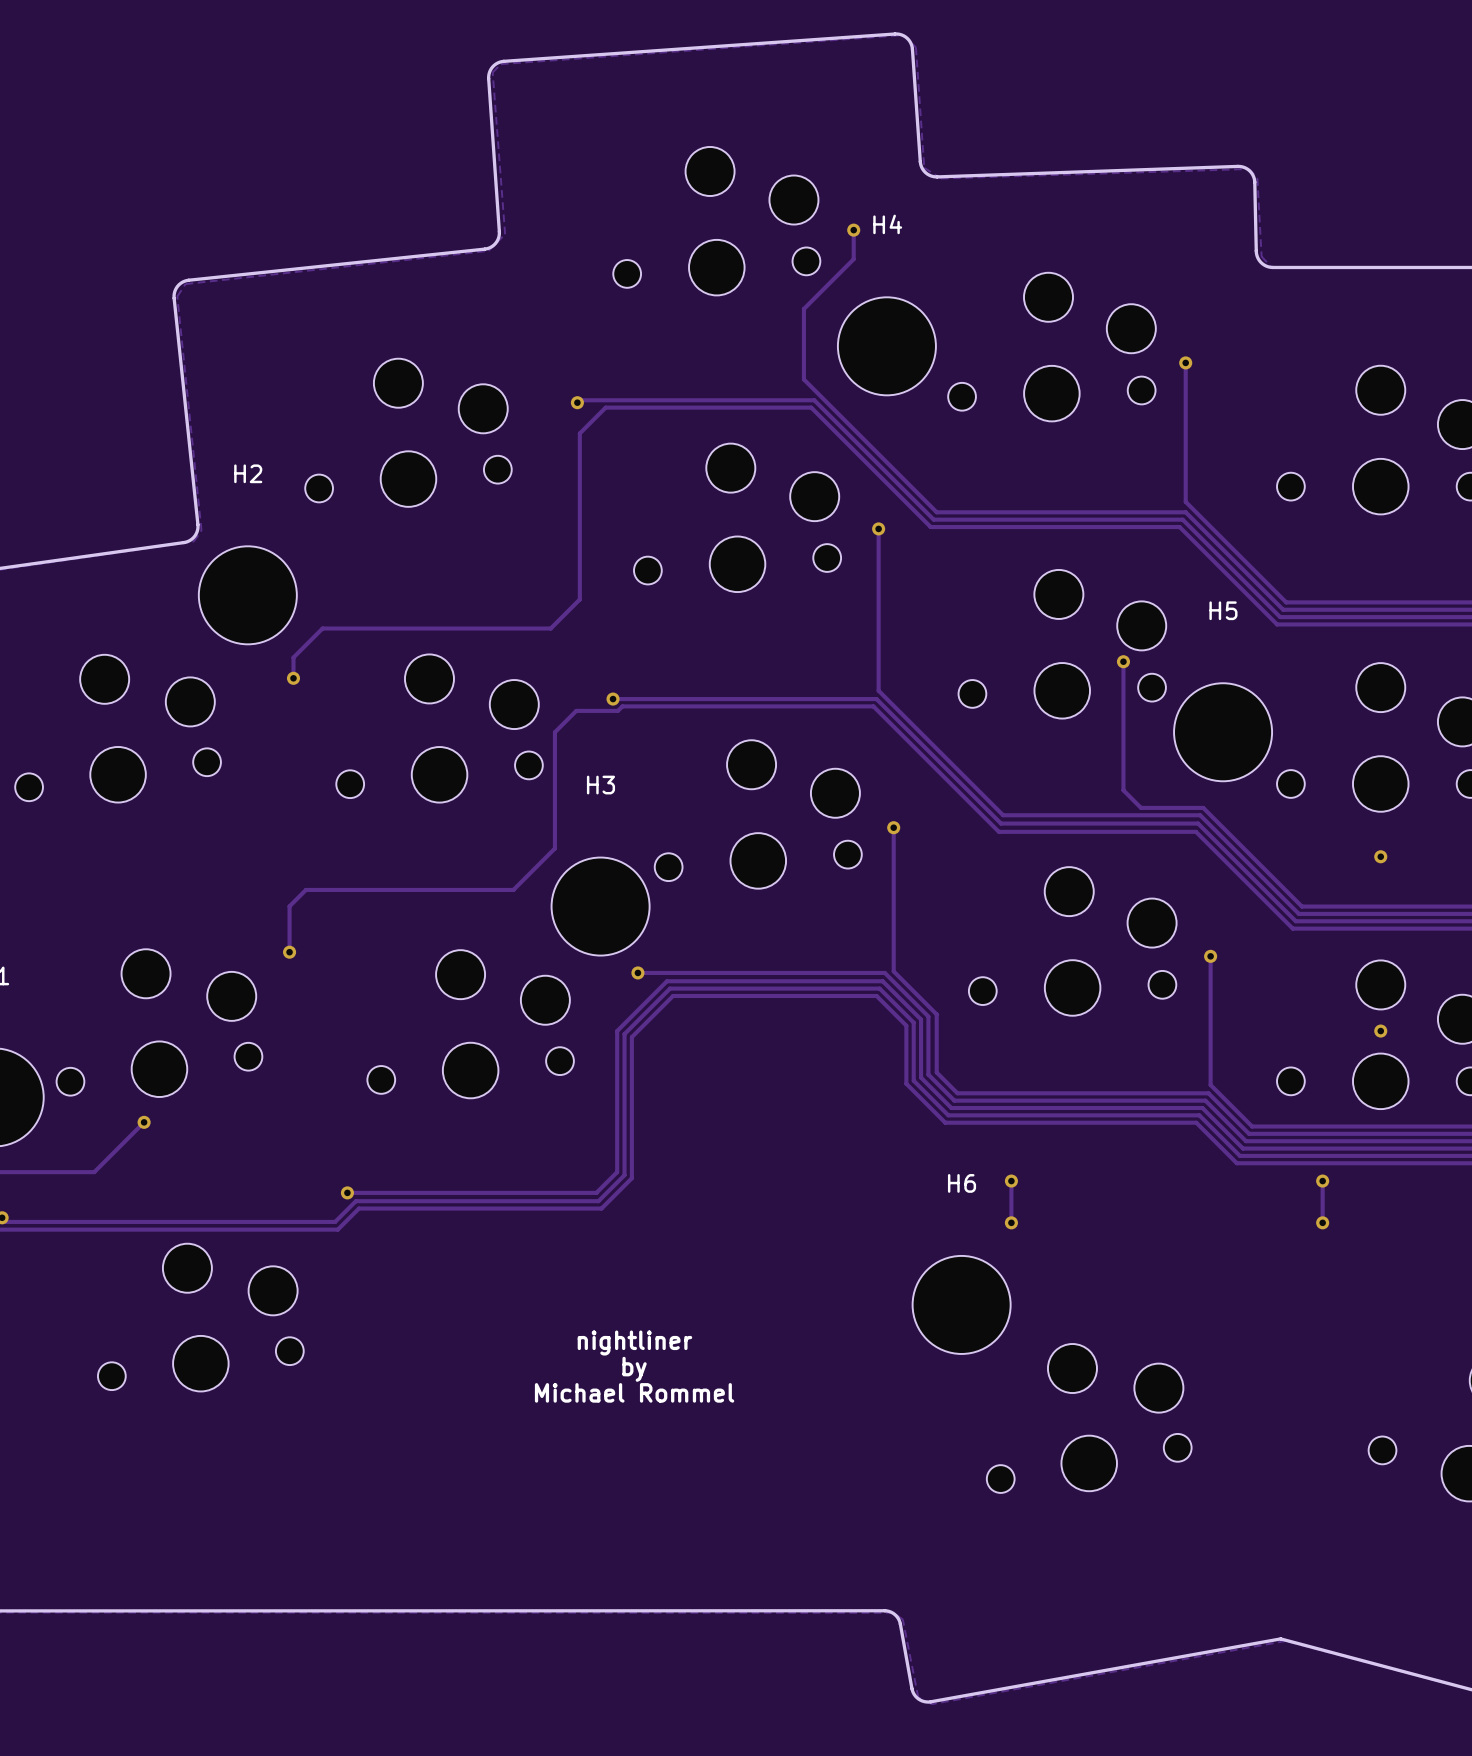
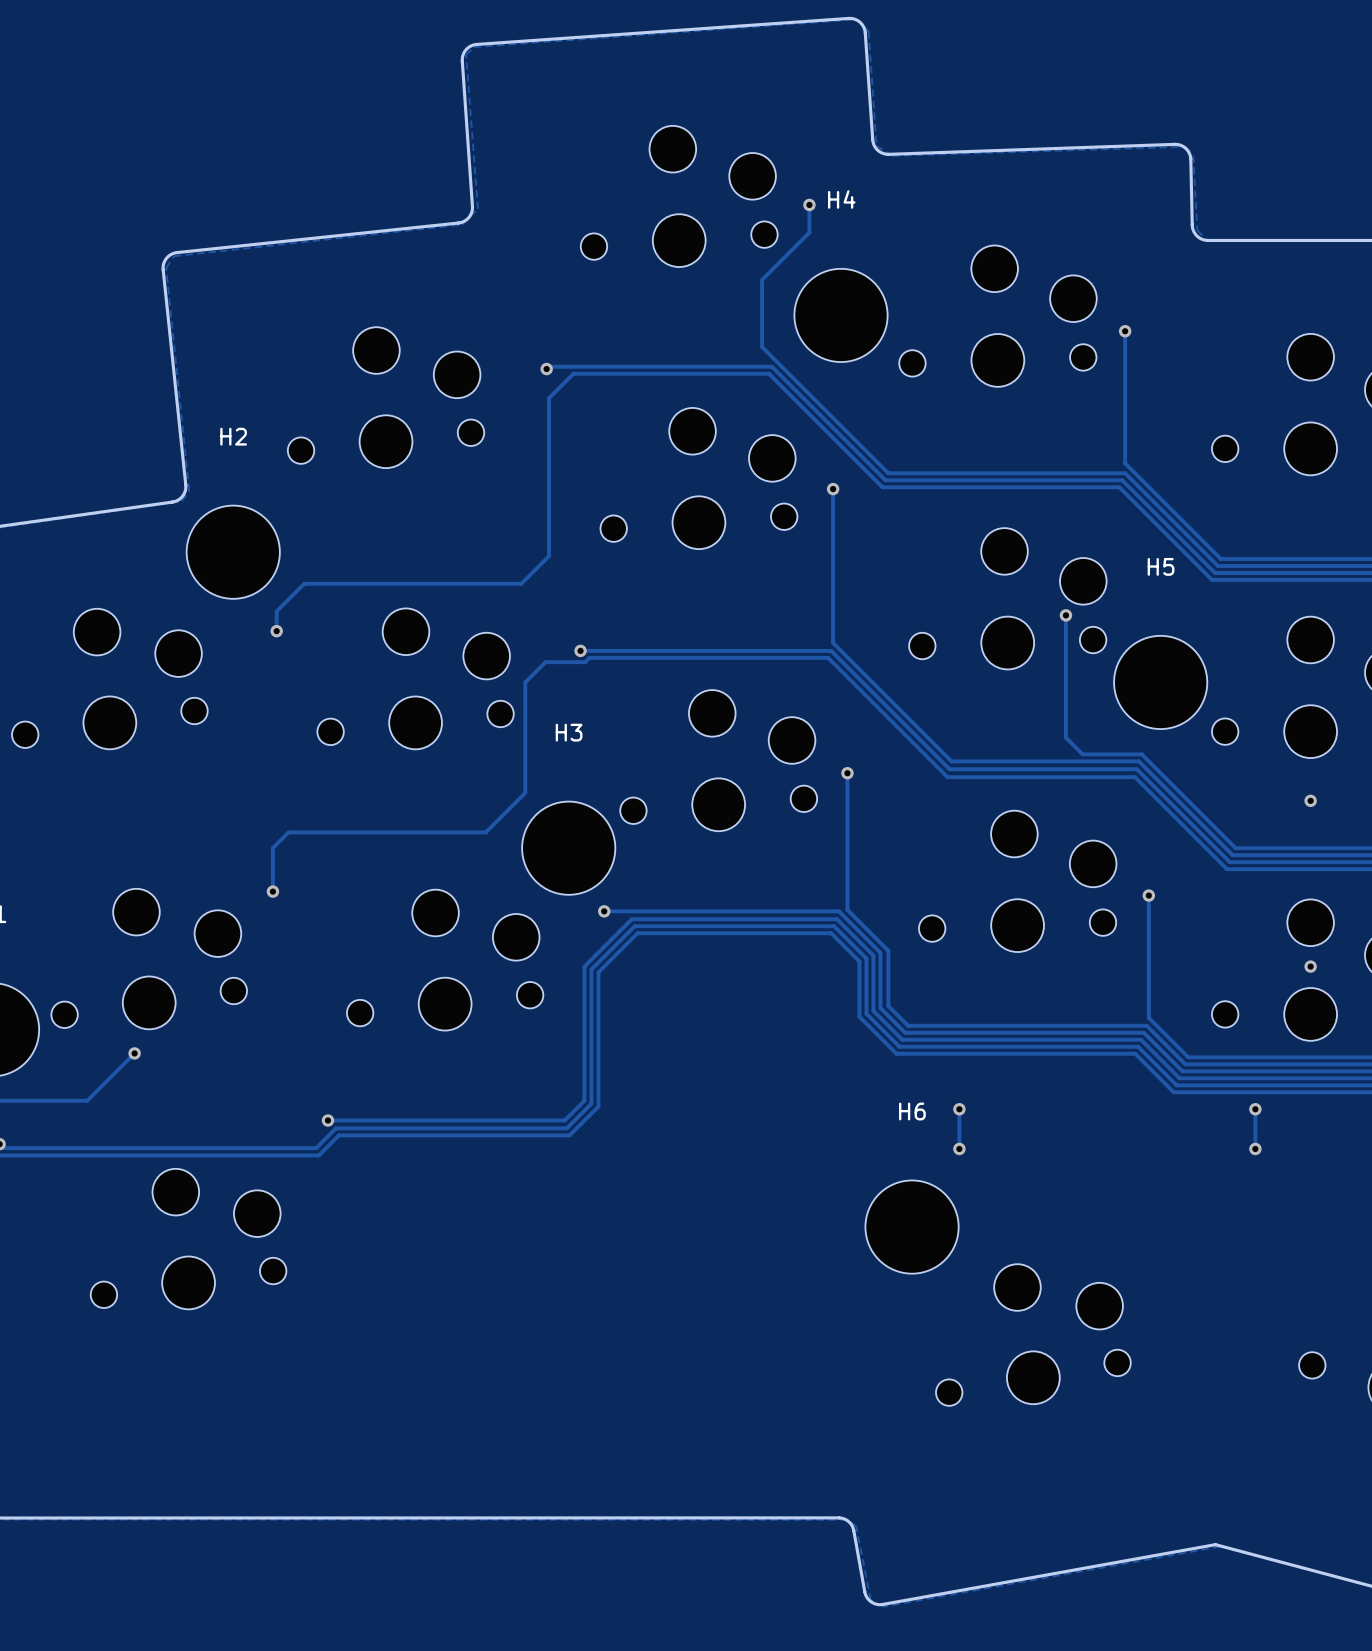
text: nightliner (634, 1342) -> none
text: by (634, 1369) -> none
text: Michael Rommel (634, 1392) -> none

